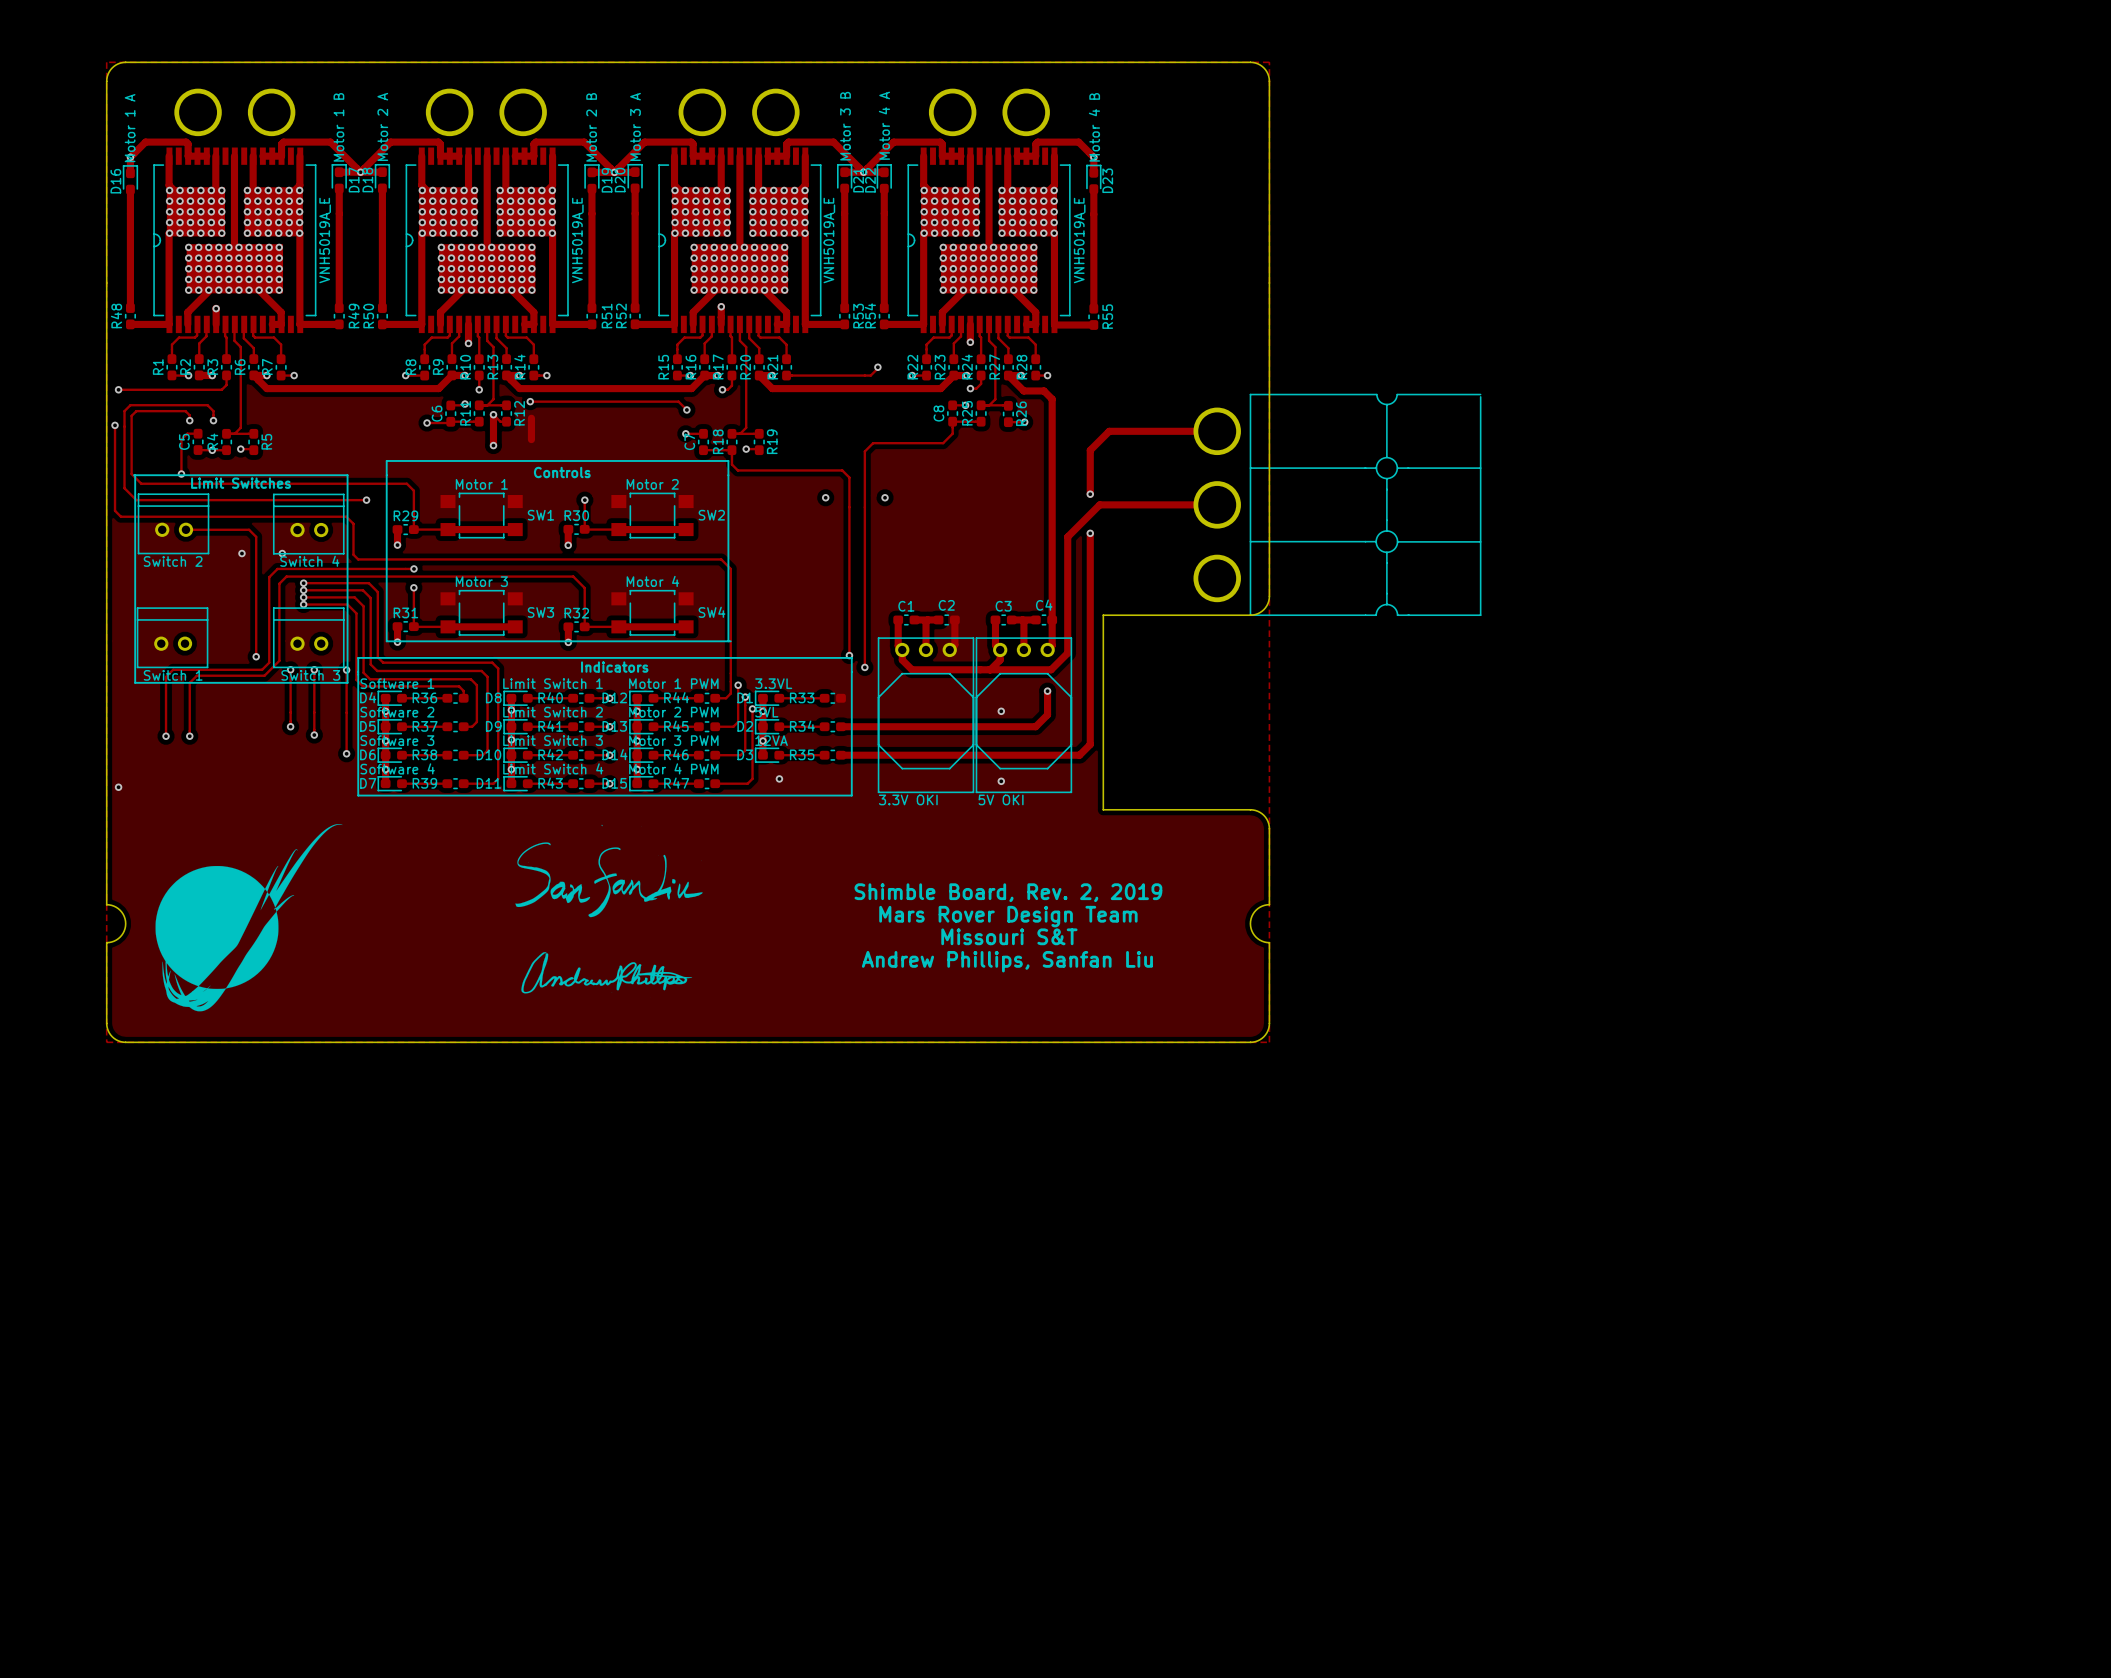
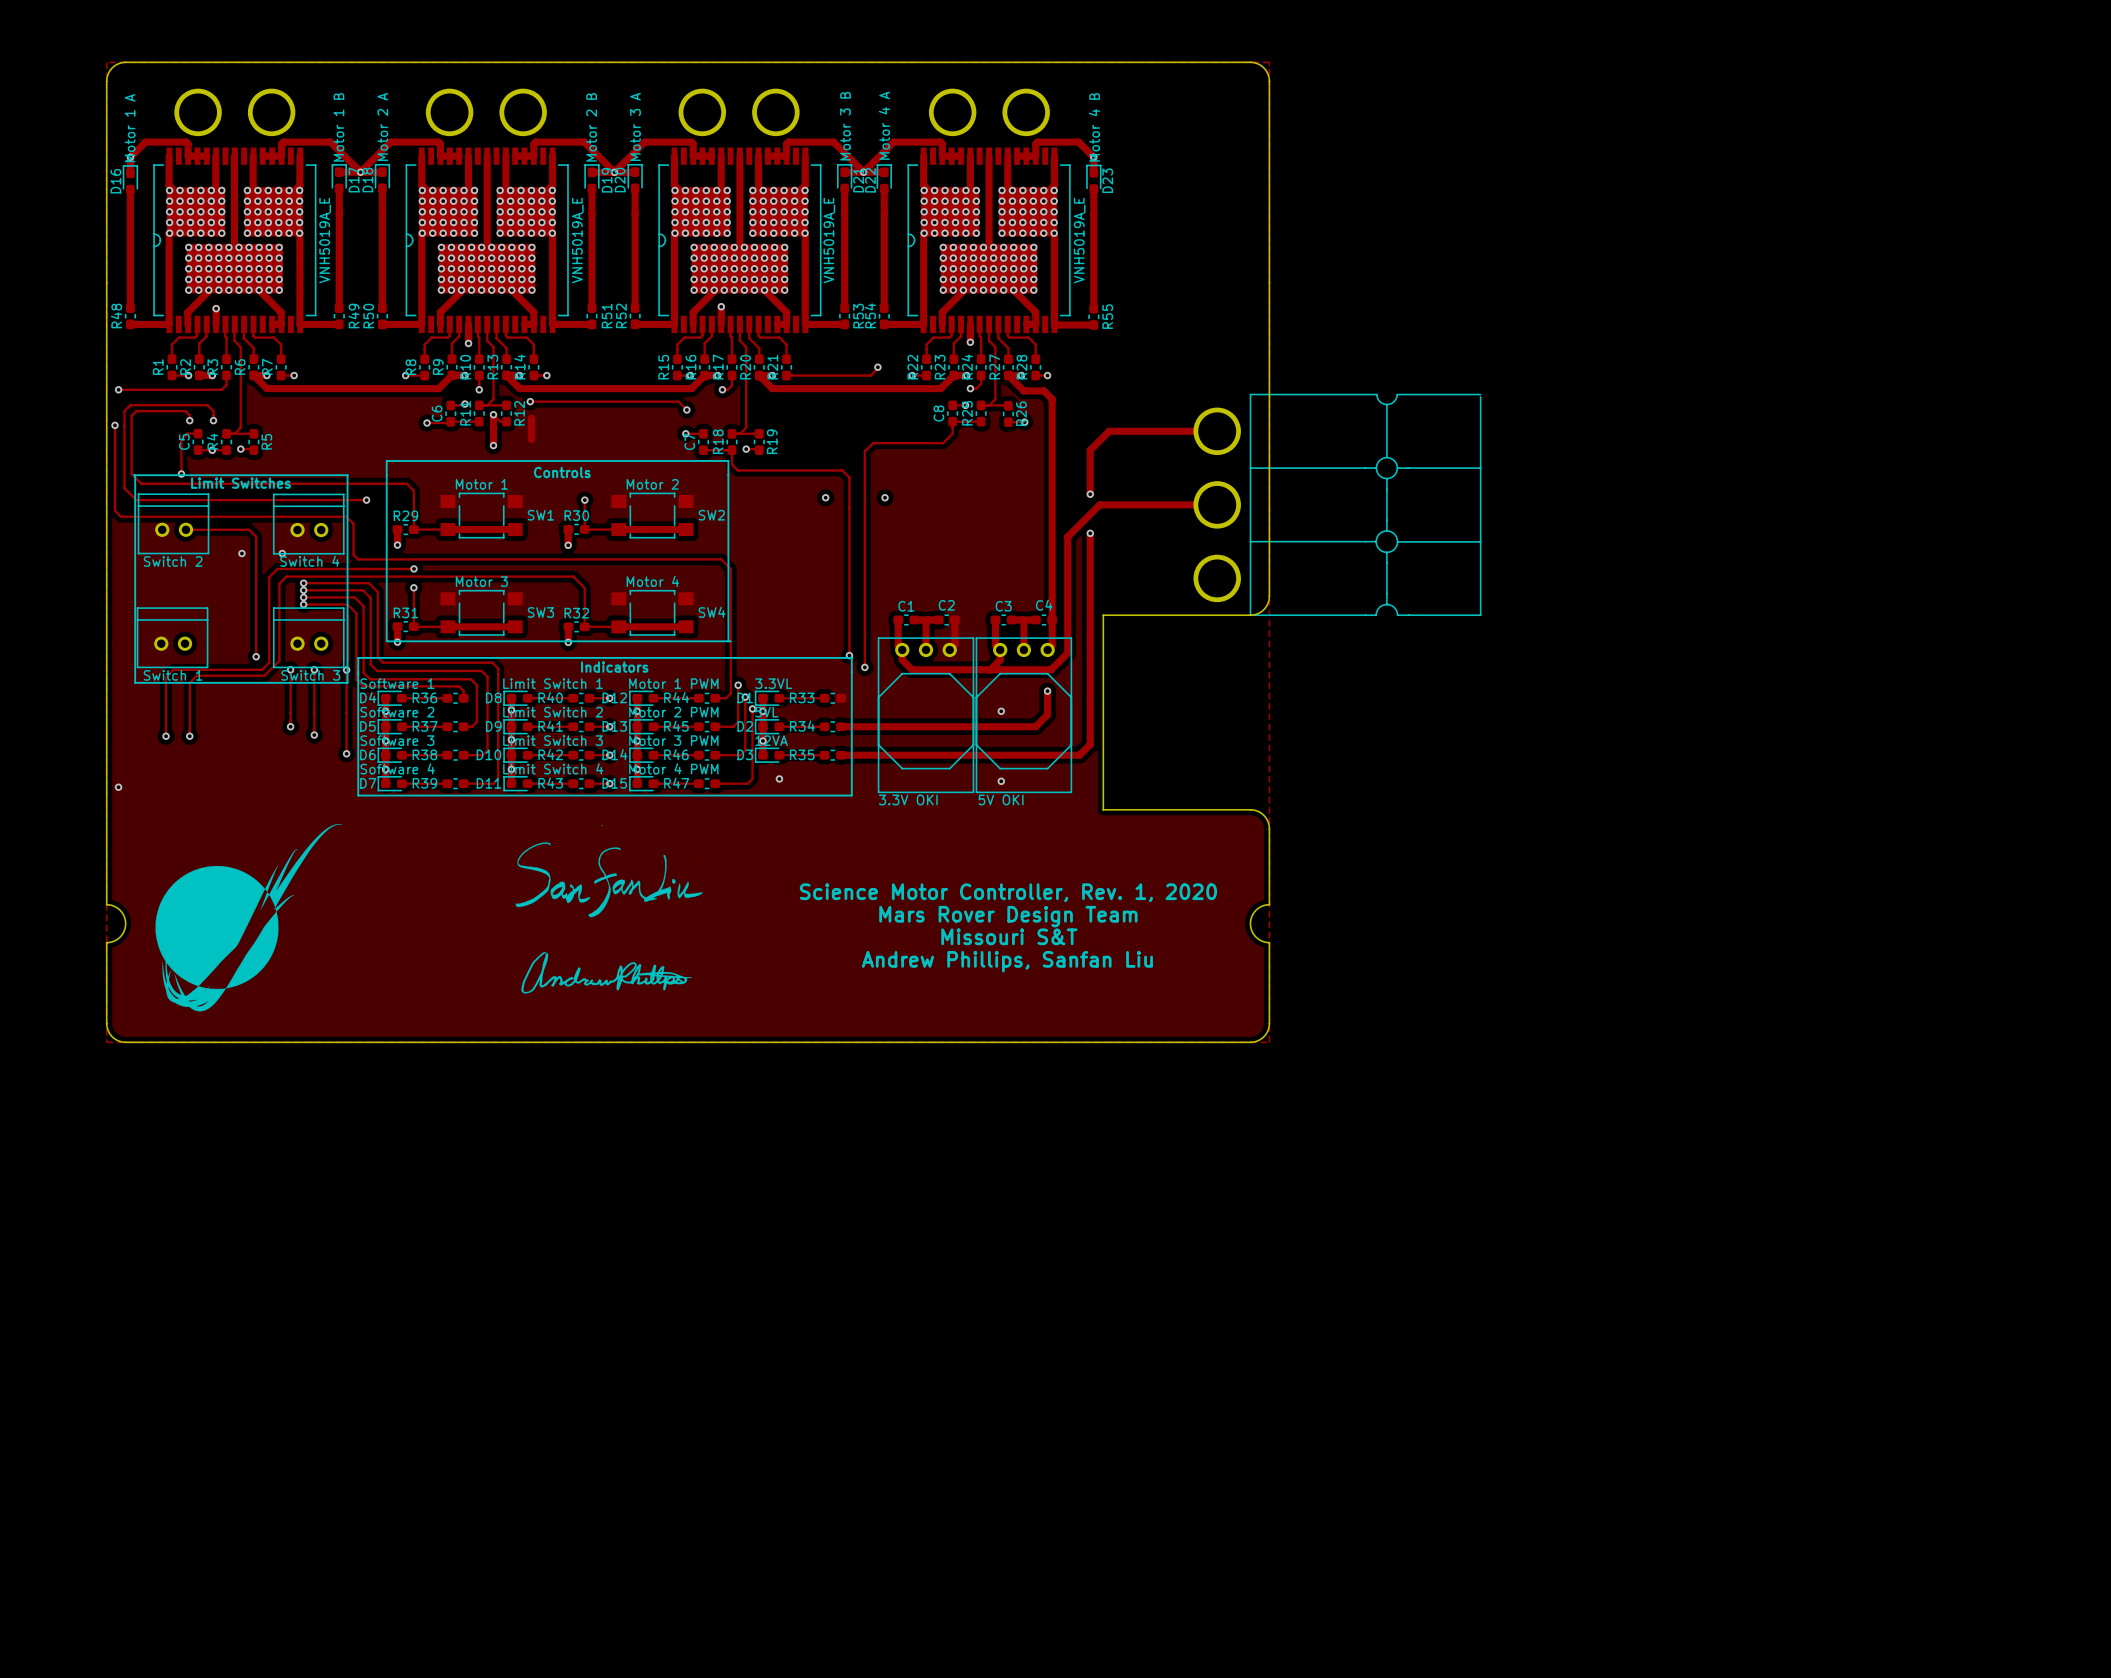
text: Shimble Board, Rev. 2, 2019 (1008, 892) -> Science Motor Controller, Rev. 1, 2020 (1008, 892)

